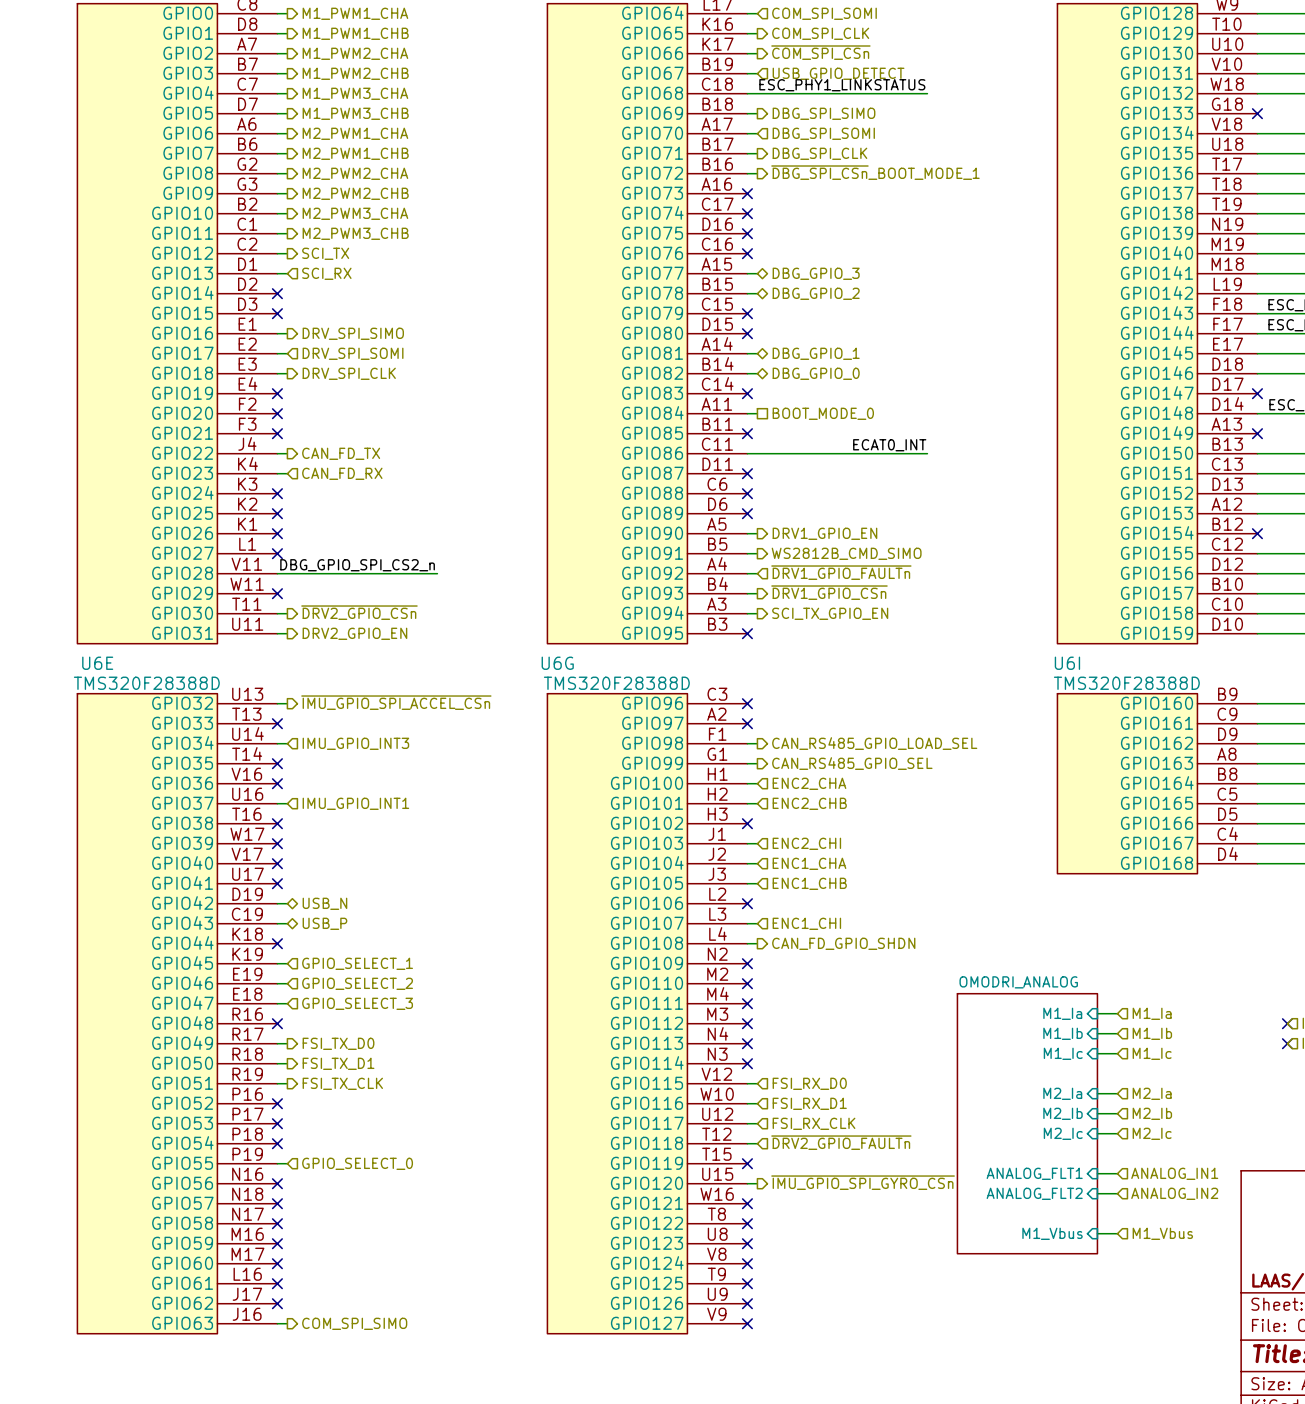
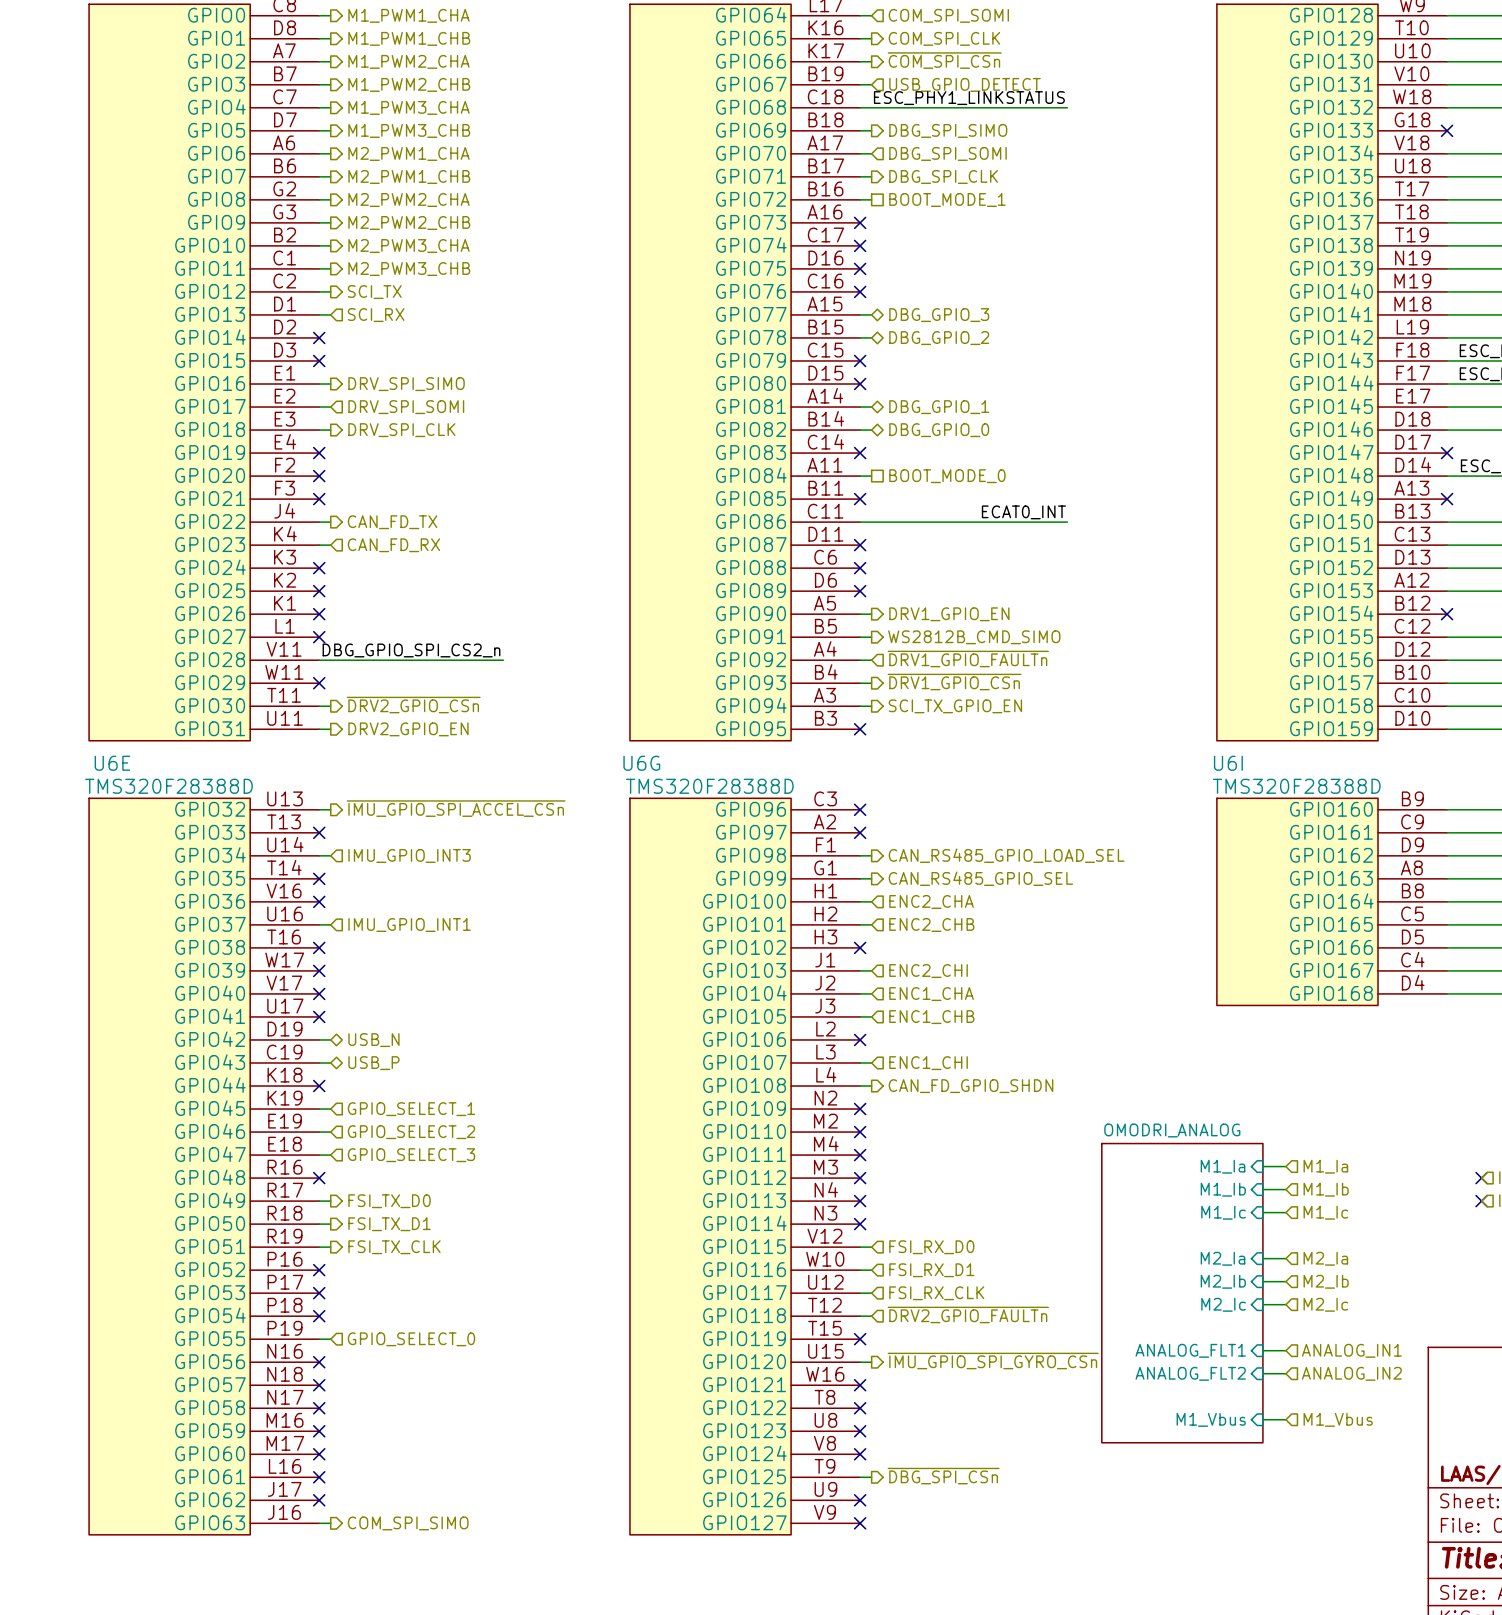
hierarchical label shape: output (875, 172) -> passive (947, 199)
hierarchical label: ~{DBG_SPI_CSn}_BOOT_MODE_1 (875, 172) -> BOOT_MODE_1 (947, 199)
hierarchical label: none -> ~{DBG_SPI_CSn} (943, 1476)
wire: none -> (860, 1477) (871, 1477)
no-connect mark: (747, 1283) -> none

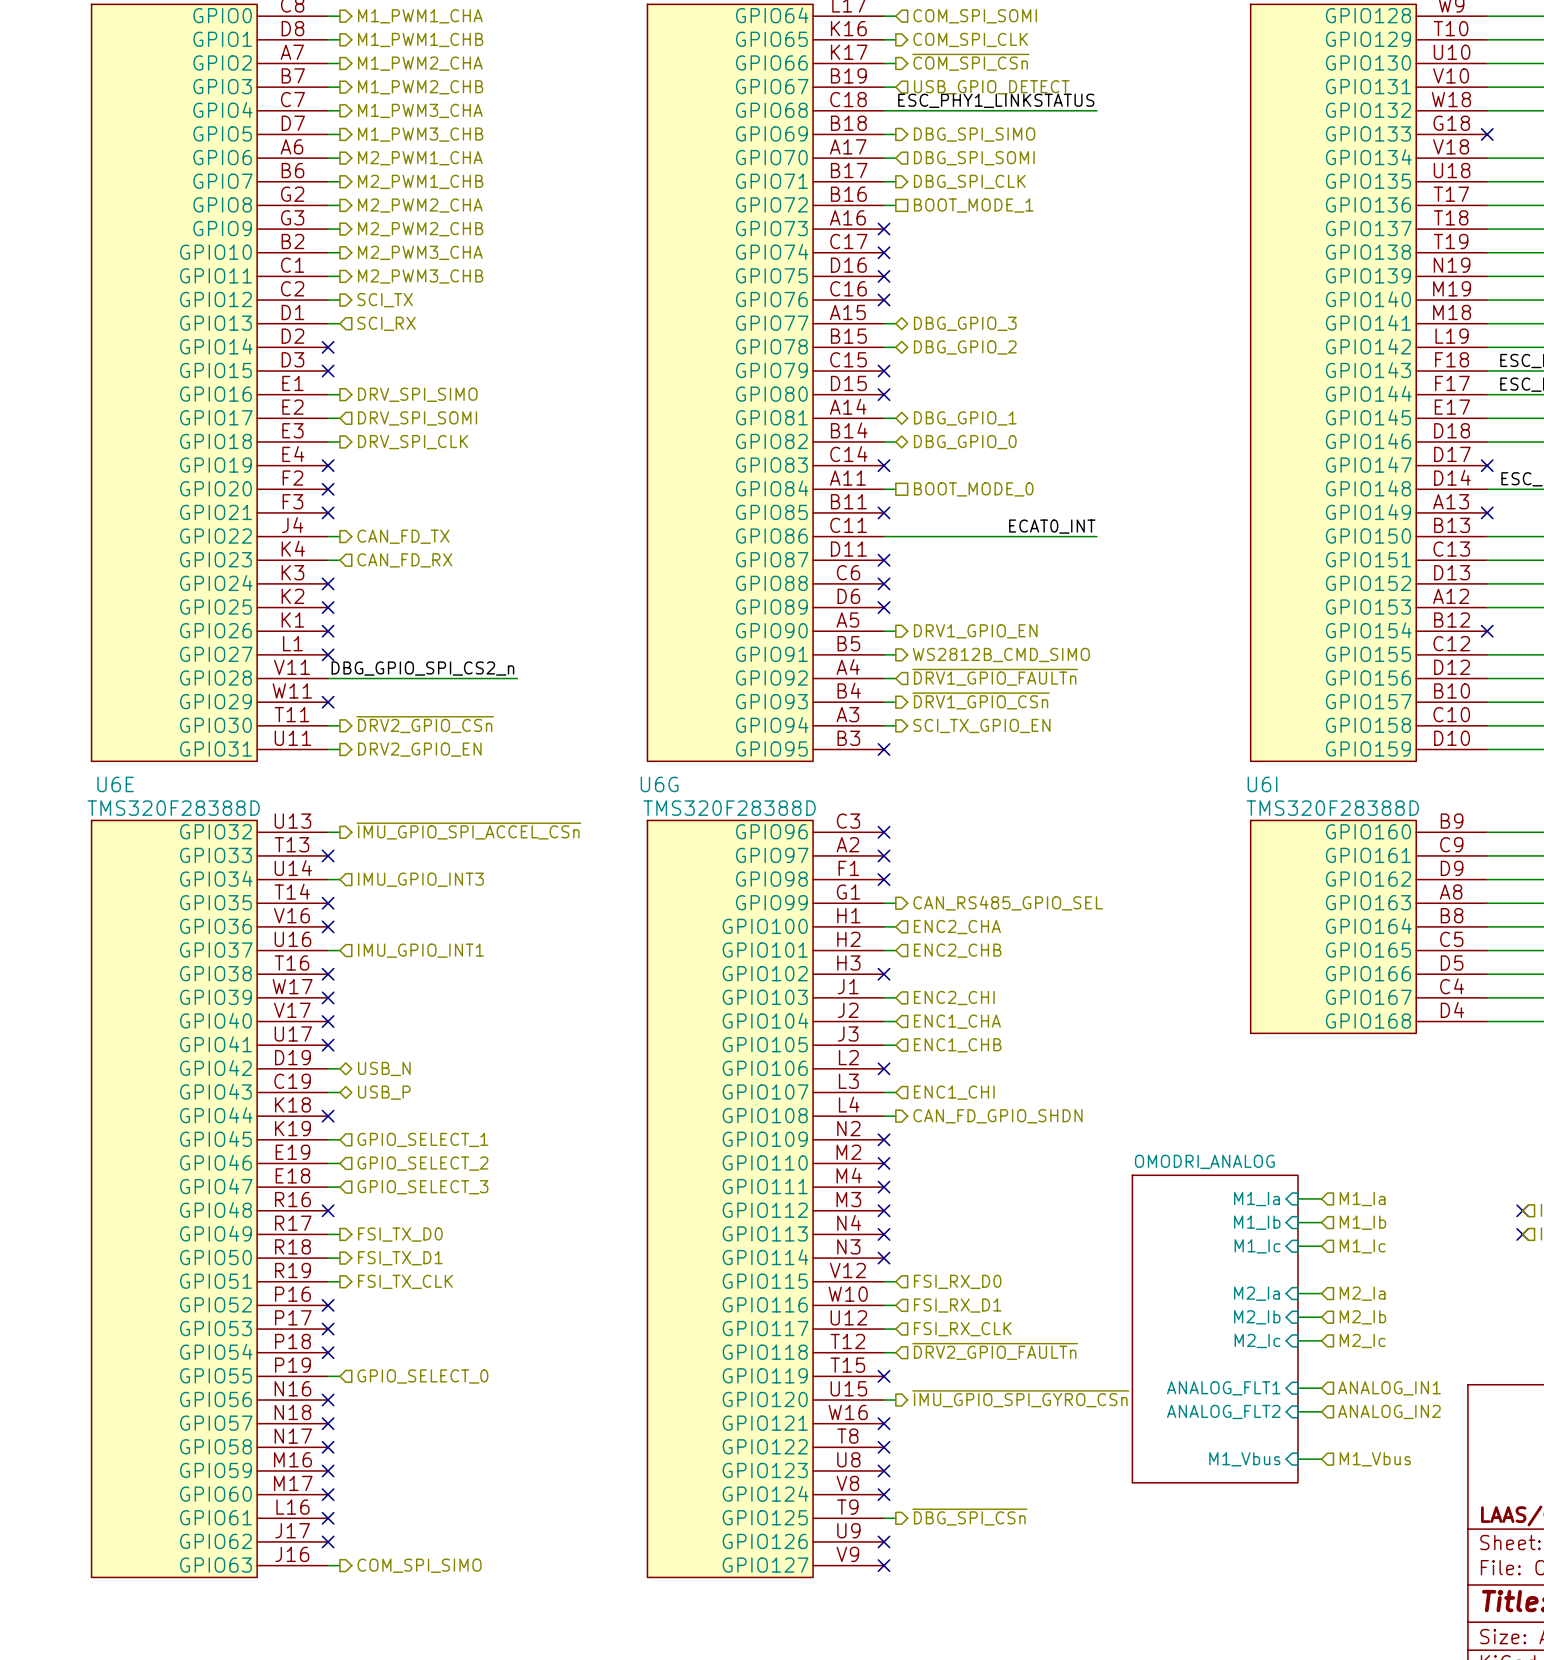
wire: (860, 855) (871, 855) -> none
no-connect mark: none -> (884, 879)
hierarchical label: CAN_RS485_GPIO_LOAD_SEL (1006, 855) -> none

